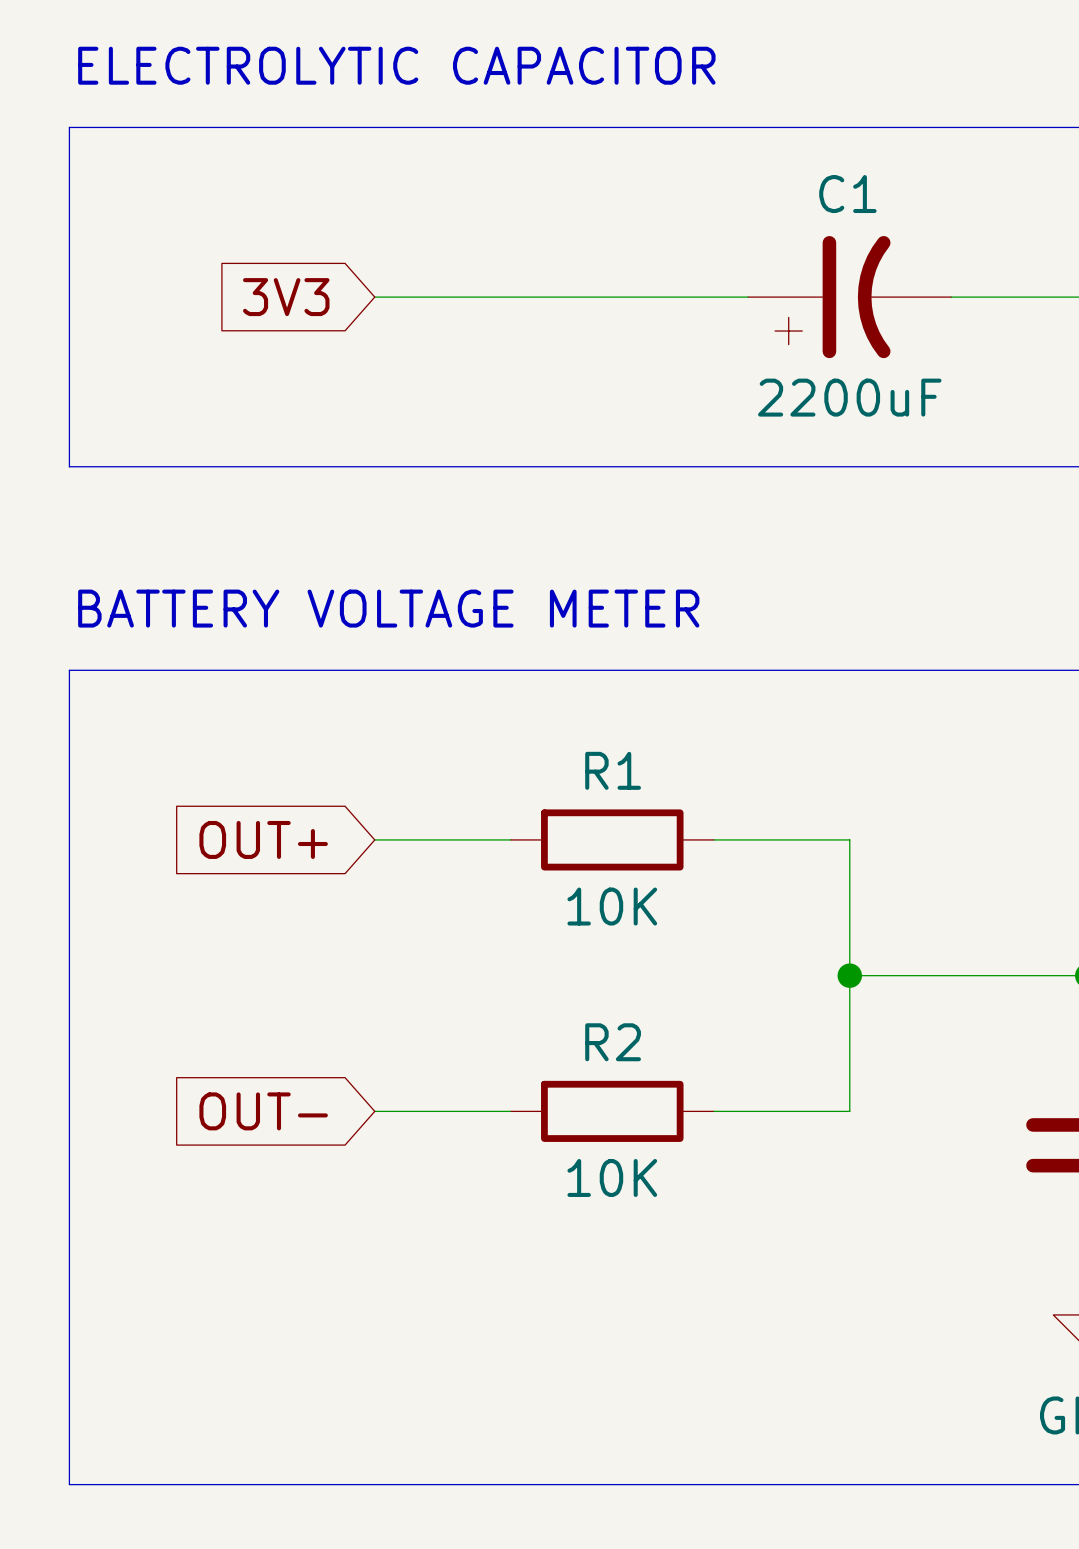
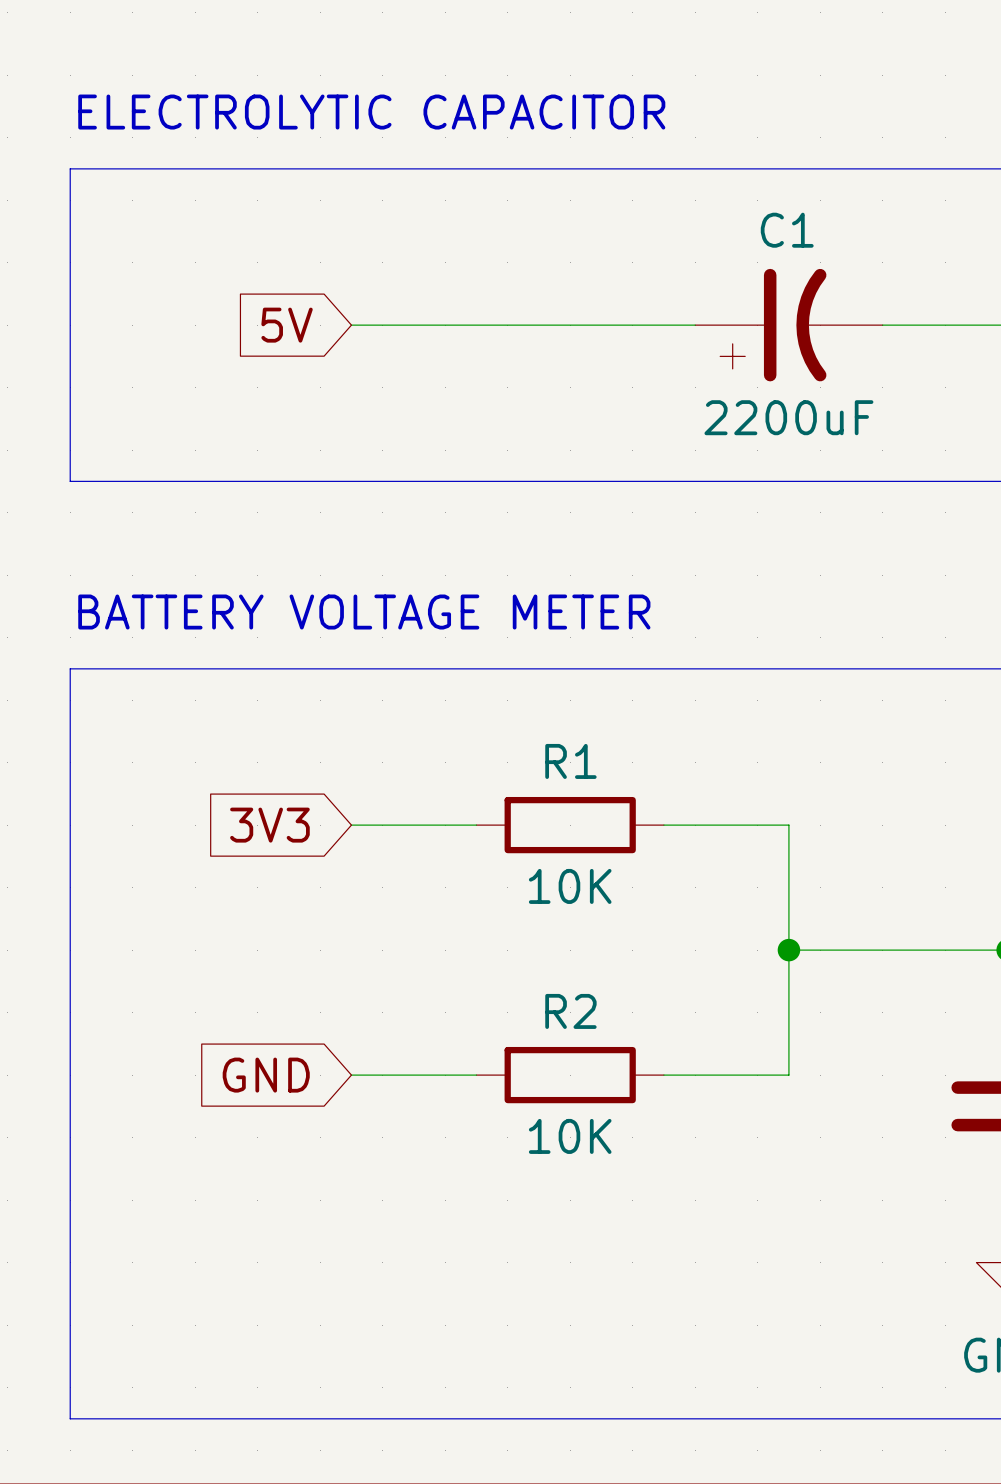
global label: 3V3 (286, 297) -> 5V (287, 325)
global label: OUT+ (263, 839) -> 3V3 (269, 825)
global label: OUT- (263, 1111) -> GND (266, 1075)

